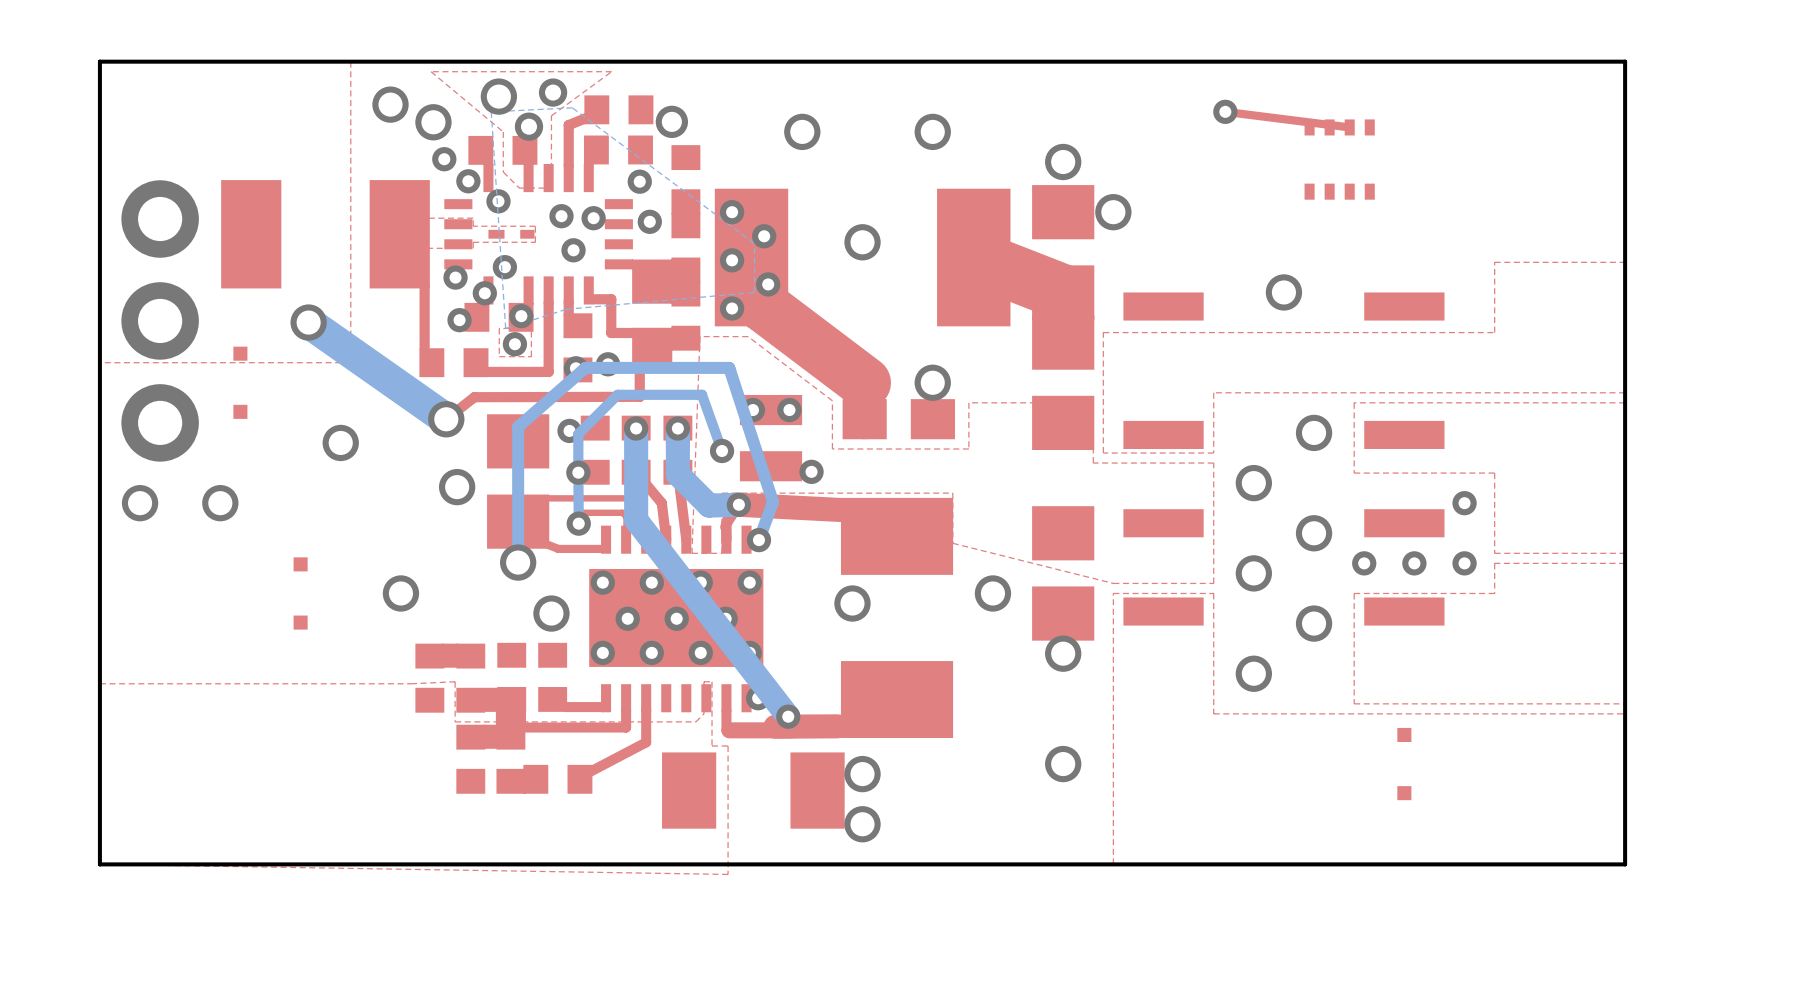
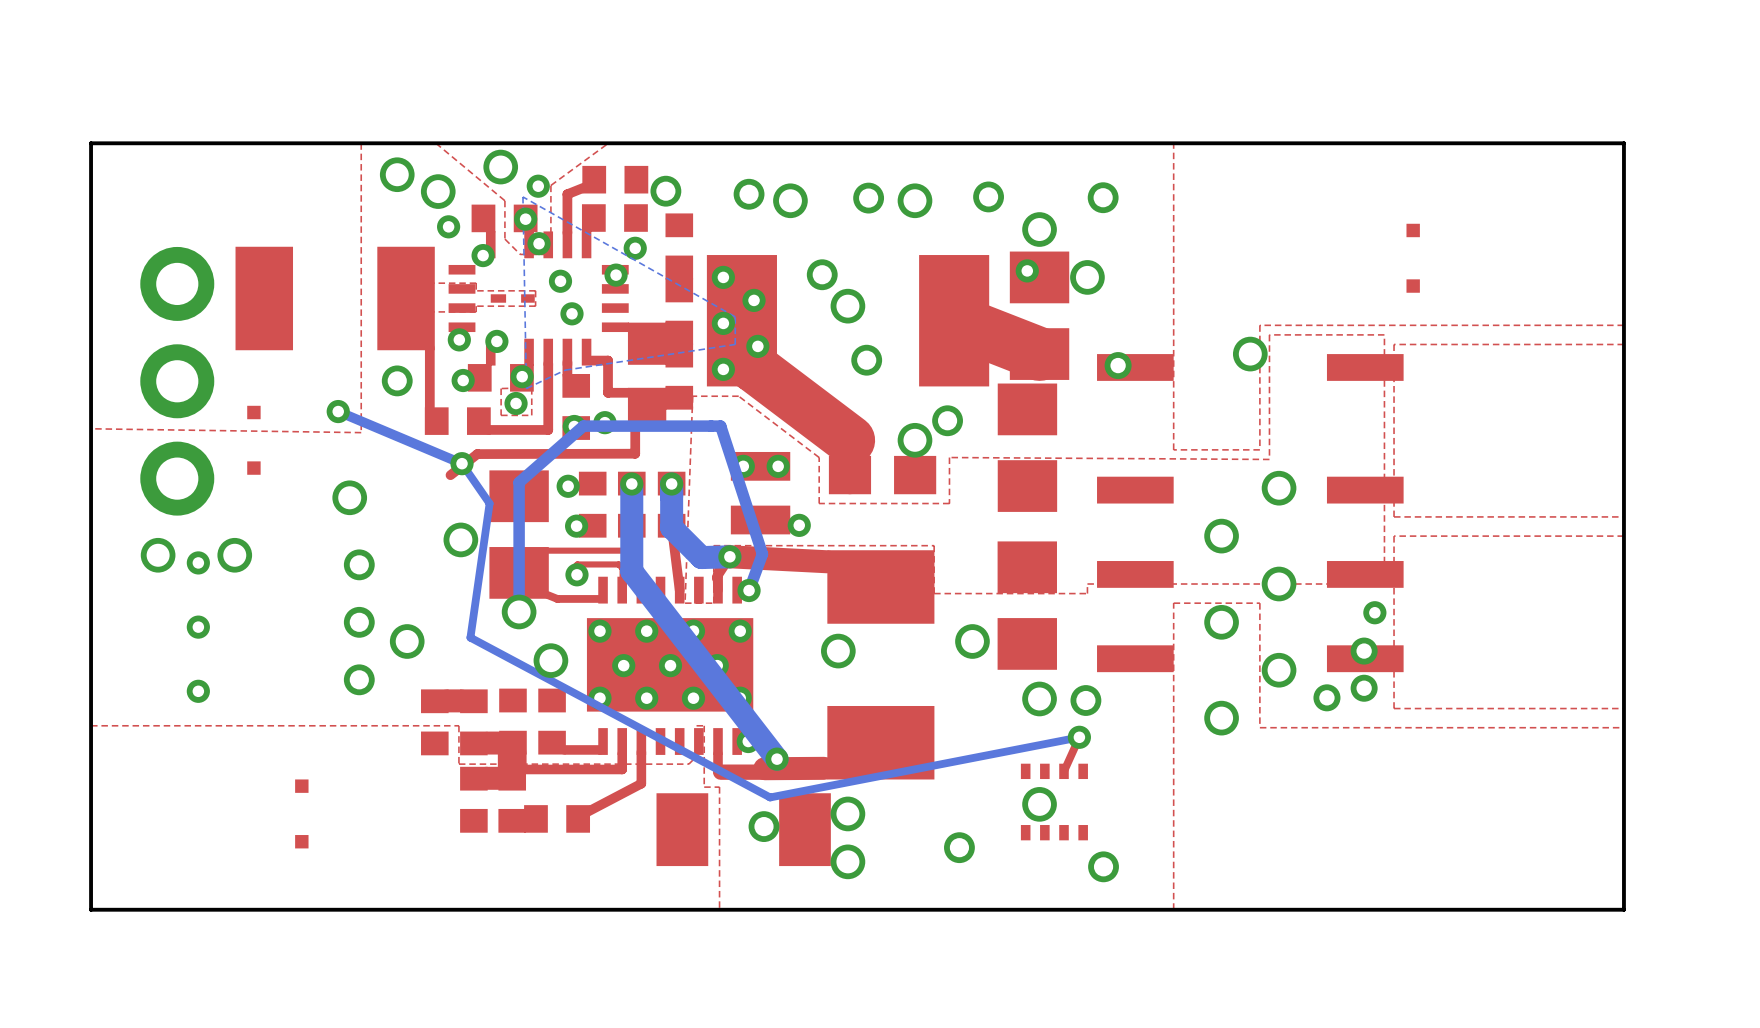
top zone outline: (350, 61) (350, 362) (99, 362) -> none
board edge: (1625, 61) (99, 61) (99, 864) (1625, 864) (1625, 61) -> (1623, 143) (1623, 909) (91, 909) (91, 143) (1623, 143)
top zone outline: none -> (361, 143) (361, 432) (91, 428)
top zone outline: none -> (1173, 143) (1173, 449) (1183, 449)
via: (553, 92) -> none
bottom zone outline: (572, 107) (754, 243) (754, 292) (566, 309) (505, 328) (491, 111) (572, 107) -> (522, 196) (735, 316) (735, 344) (565, 370) (526, 388) (522, 196)
top track: (1225, 111) (1349, 127) -> none
via: (1225, 111) -> none
via: none -> (538, 186)
via: none -> (749, 194)
via: (528, 126) -> none
via: none -> (988, 196)
via: none -> (1103, 197)
via: none -> (868, 198)
via: none -> (525, 219)
part position: (1339, 159) -> (1054, 802)
via: none -> (539, 243)
via: (468, 181) -> none
via: none -> (483, 255)
part: none -> (1413, 258)
via: (498, 201) -> none
via: none -> (1027, 270)
via: none -> (616, 275)
via: none -> (822, 274)
via: (593, 218) -> none
via: (649, 221) -> none
top zone outline: (1494, 262) (1494, 332) (1103, 332) (1103, 453) (1213, 453) (1213, 392) -> (1451, 325) (1259, 325) (1259, 449)
top zone outline: none -> (1623, 325) (1576, 325)
via: (504, 267) -> none
via: none -> (496, 341)
top zone outline: none -> (1623, 344) (1394, 344) (1394, 516) (1623, 516)
via: (484, 293) -> none
via: none -> (866, 360)
via: none -> (1118, 365)
via: none -> (397, 380)
bottom track: (308, 322) (446, 419) -> none
via position: (308, 322) -> (338, 411)
bottom track: none -> (338, 411) (462, 463) (489, 503) (470, 637) (770, 797) (1079, 737)
via: none -> (947, 420)
part position: (1063, 382) -> (1027, 447)
top zone outline: (1625, 392) (1293, 392) -> none
via size: [428, 401, 465, 438] -> [450, 452, 474, 476]
top zone outline: (968, 402) (1093, 402) (1093, 463) (1213, 463) (1213, 583) (1113, 583) (952, 543) -> (949, 459) (949, 457) (1269, 459) (1269, 334) (1384, 334) (1384, 584) (1087, 584) (1087, 593) (934, 593)
top zone outline: (1625, 402) (1354, 402) (1354, 473) (1494, 473) (1494, 553) (1625, 553) -> none
bottom track: (722, 450) (701, 394) (617, 394) (578, 434) (578, 523) -> none
via: (722, 450) -> none
top track: (636, 472) (661, 503) (666, 539) -> none
top zone outline: none -> (1623, 536) (1394, 536) (1394, 708) (1623, 708)
via: (1464, 503) -> none
via: none -> (198, 562)
via: none -> (359, 564)
via: (1364, 563) -> none
via: (1464, 563) -> none
top zone outline: (1625, 563) (1494, 563) (1494, 593) (1354, 593) (1354, 703) (1625, 703) -> none
via: none -> (359, 622)
part position: (1063, 573) -> (1027, 605)
via: none -> (198, 627)
part position: (300, 593) -> (301, 813)
via: none -> (1364, 651)
via: none -> (359, 679)
via: none -> (1364, 688)
via: none -> (198, 691)
via: none -> (1326, 697)
via: none -> (1085, 700)
top zone outline: (455, 681) (410, 683) (99, 683) -> (458, 725) (91, 725)
top zone outline: none -> (1623, 727) (1259, 727) (1259, 603) (1173, 603) (1173, 909)
top track: none -> (1079, 737) (1064, 771)
via: none -> (1079, 737)
top zone outline: (1625, 713) (1213, 713) (1213, 593) (1113, 593) (1113, 864) -> none
part: (1404, 764) -> none
via: none -> (763, 826)
via: none -> (959, 847)
via: none -> (1103, 866)
top zone outline: (99, 864) (728, 874) -> none

